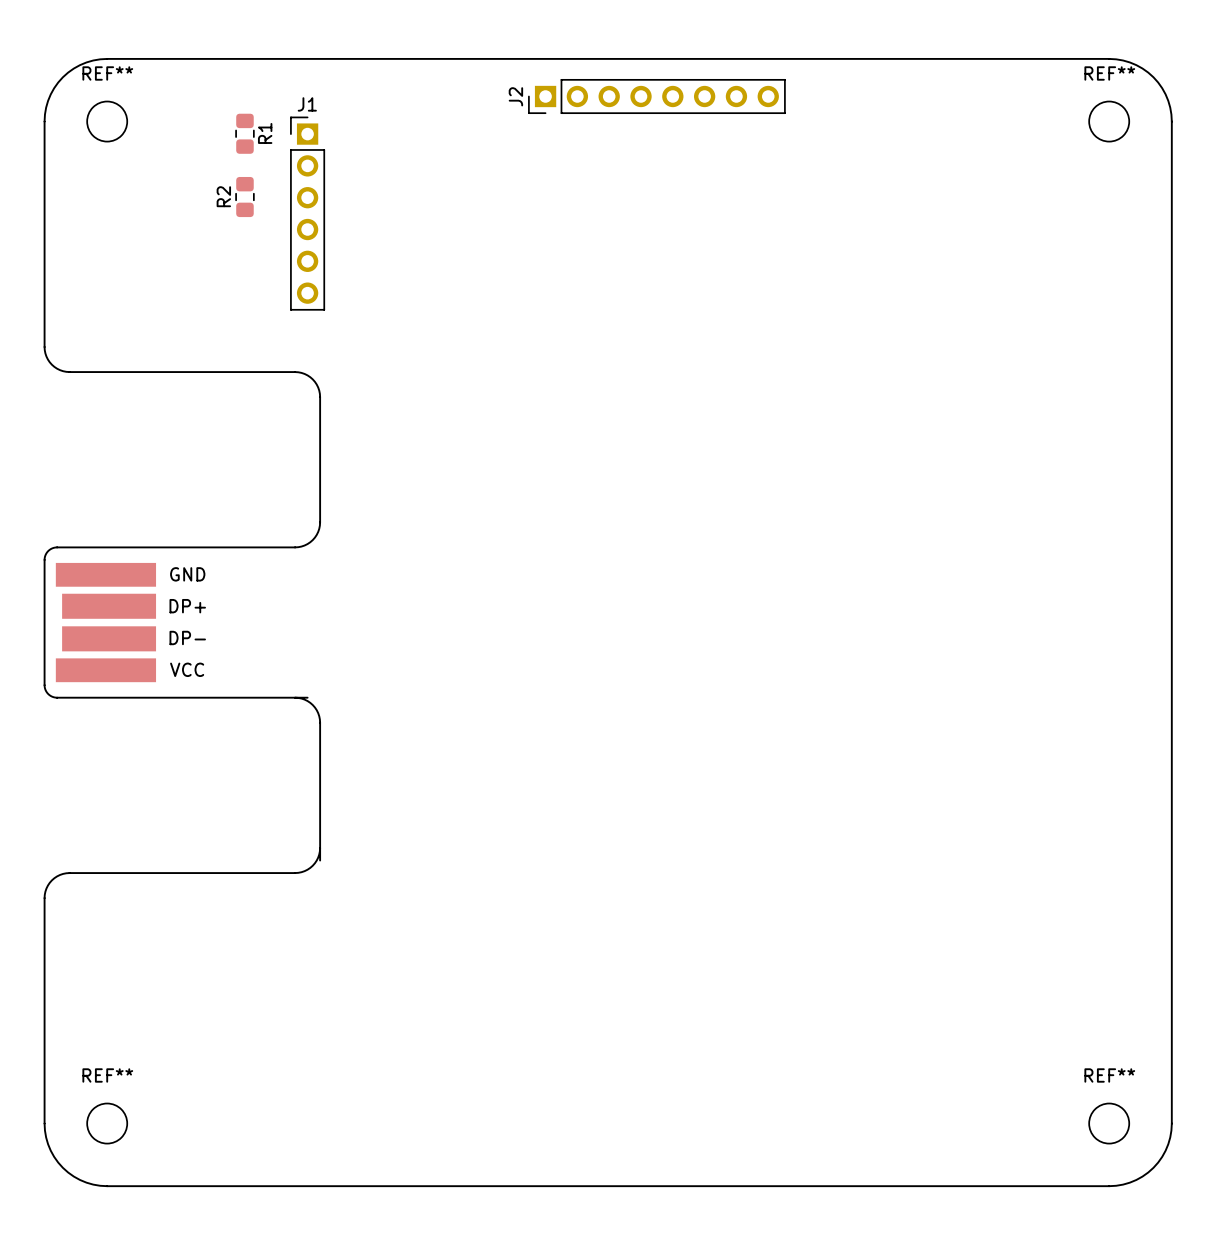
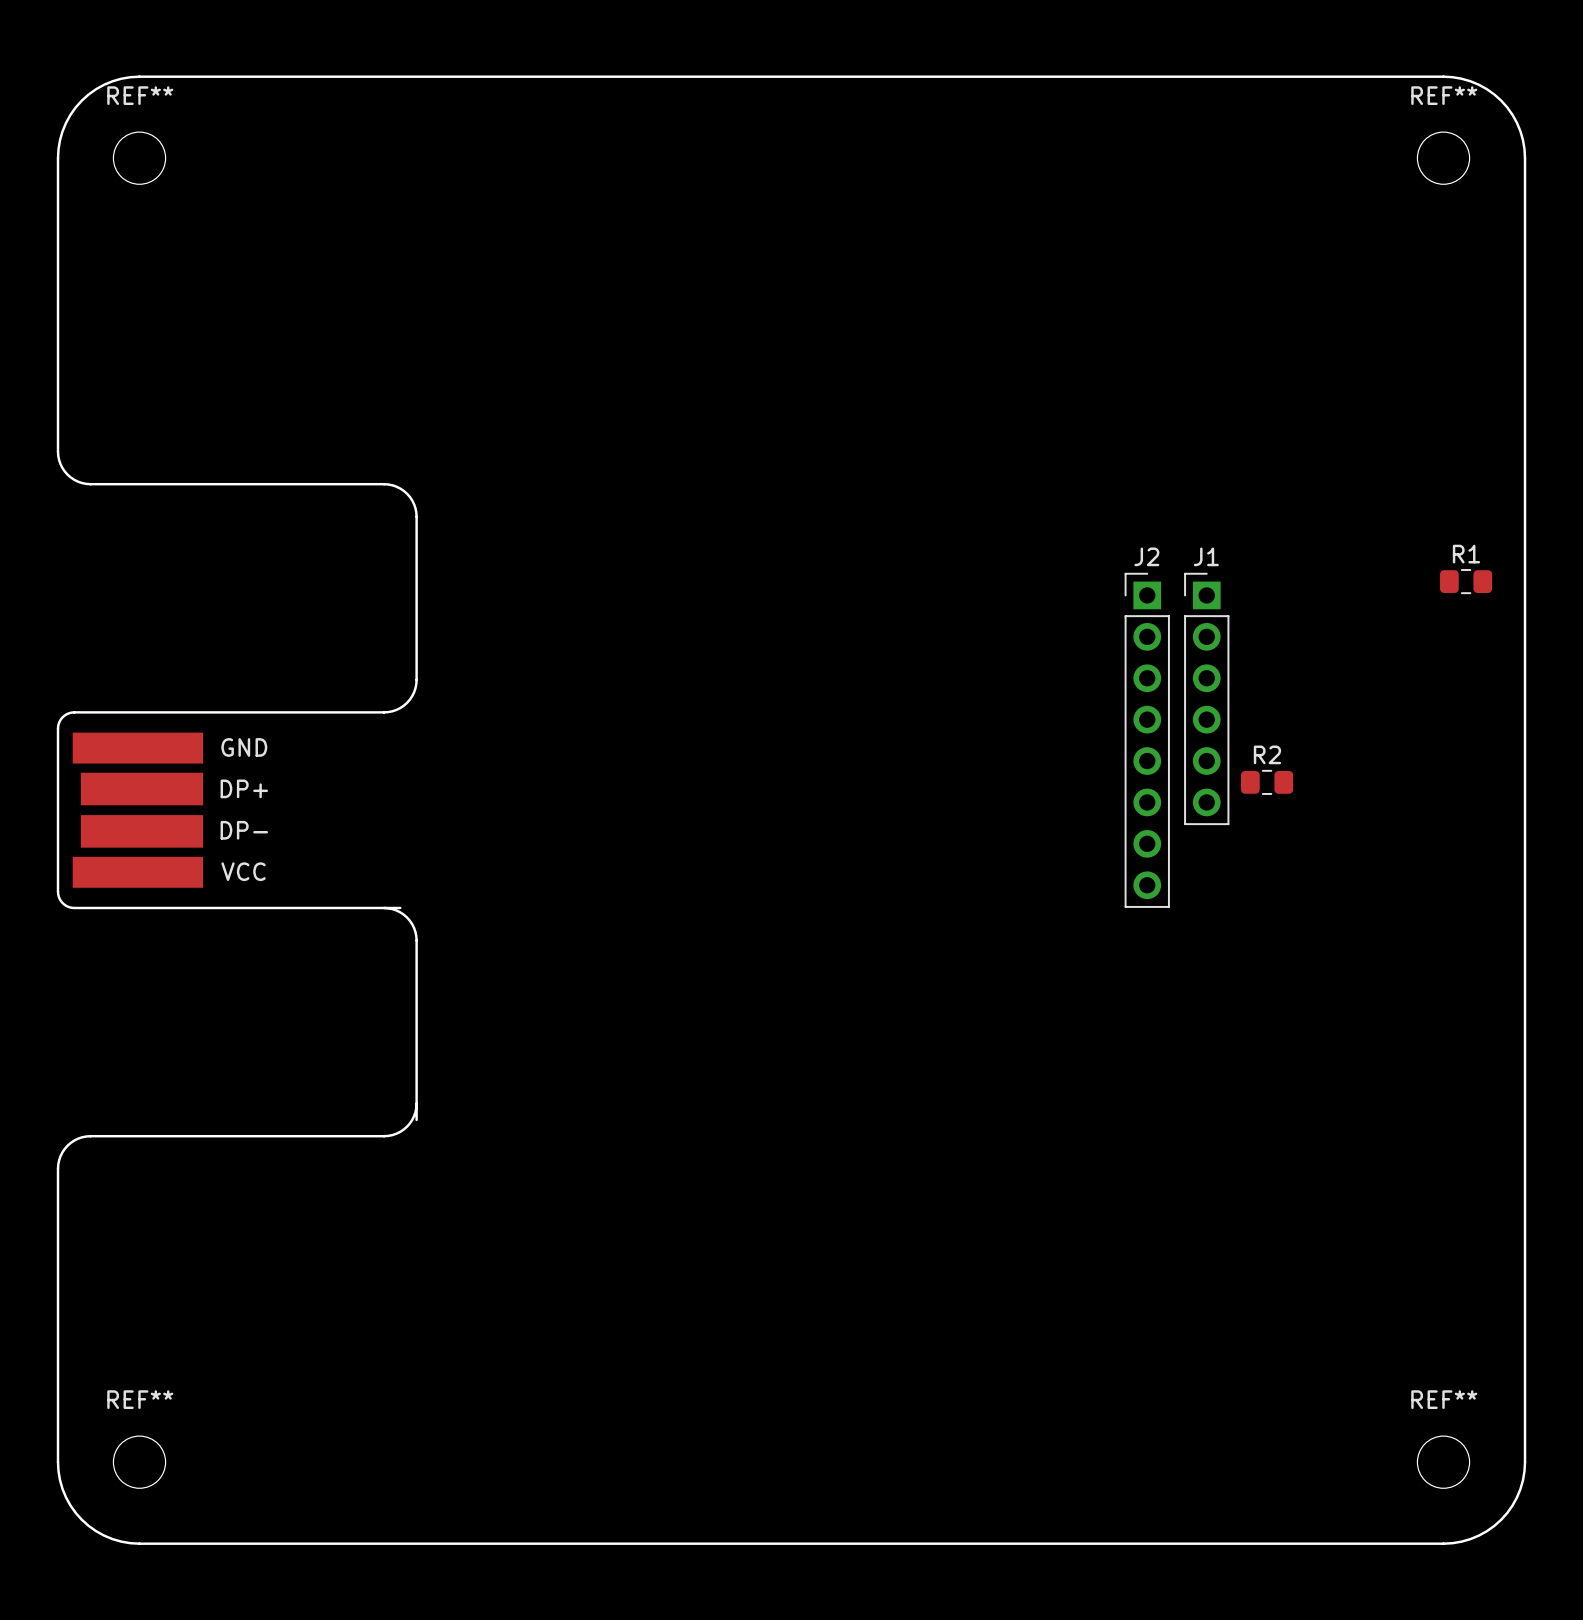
J2 rotation: 0° (656, 96) -> 90° clockwise (1147, 740)
J2 position: (656, 96) -> (1147, 740)
R1 rotation: 0° (244, 133) -> 90° clockwise (1466, 581)
R1 position: (244, 133) -> (1466, 581)
R1 name position: R1 (265, 133) -> R1 (1466, 554)
R2 rotation: 0° (244, 197) -> 90° clockwise (1267, 782)
R2 position: (244, 197) -> (1267, 782)
J1 position: (307, 213) -> (1206, 698)

